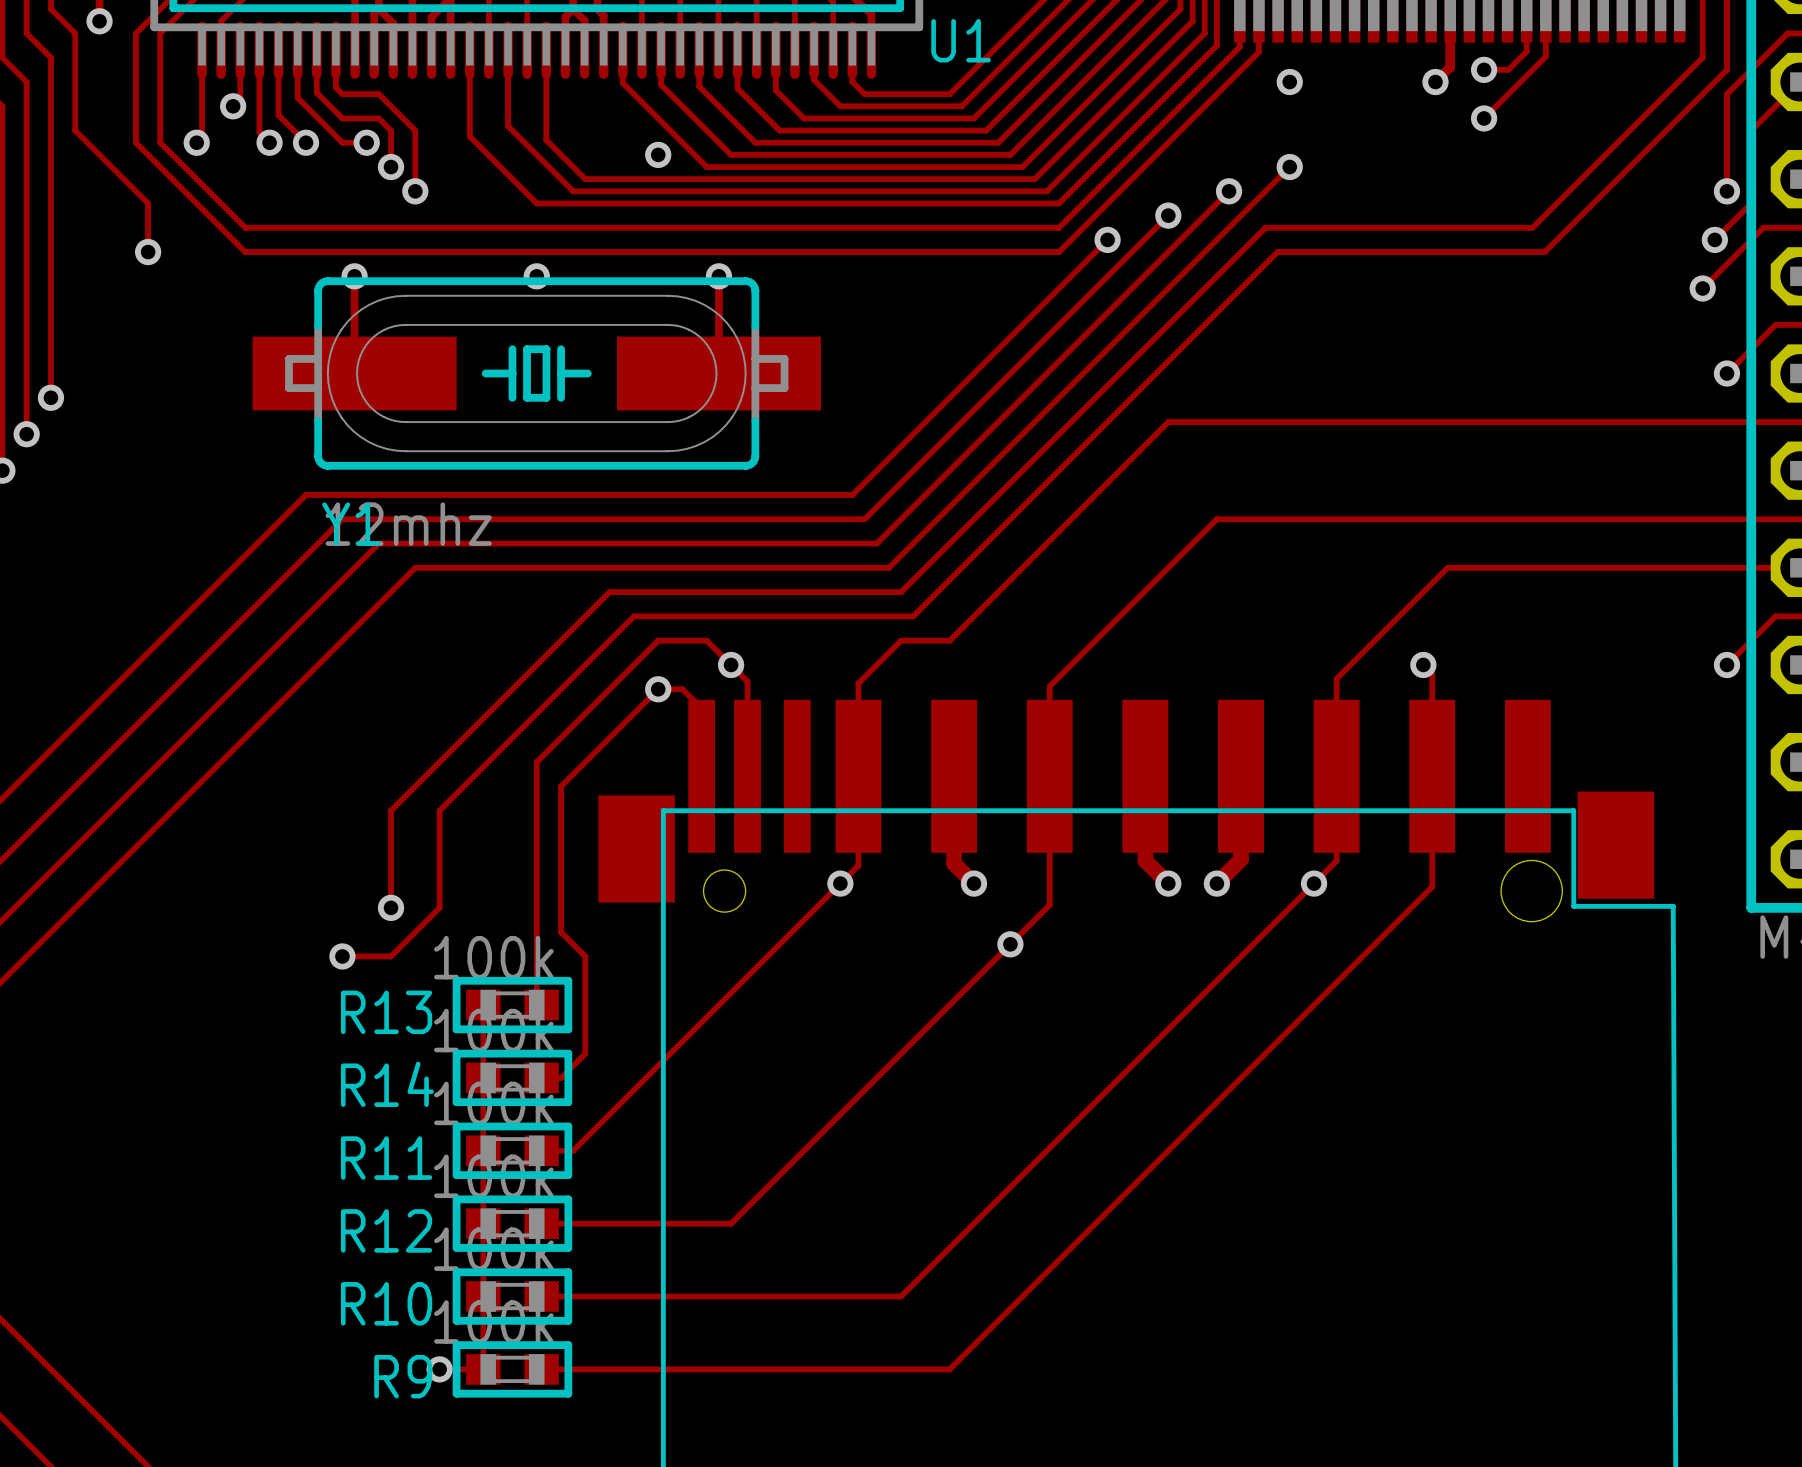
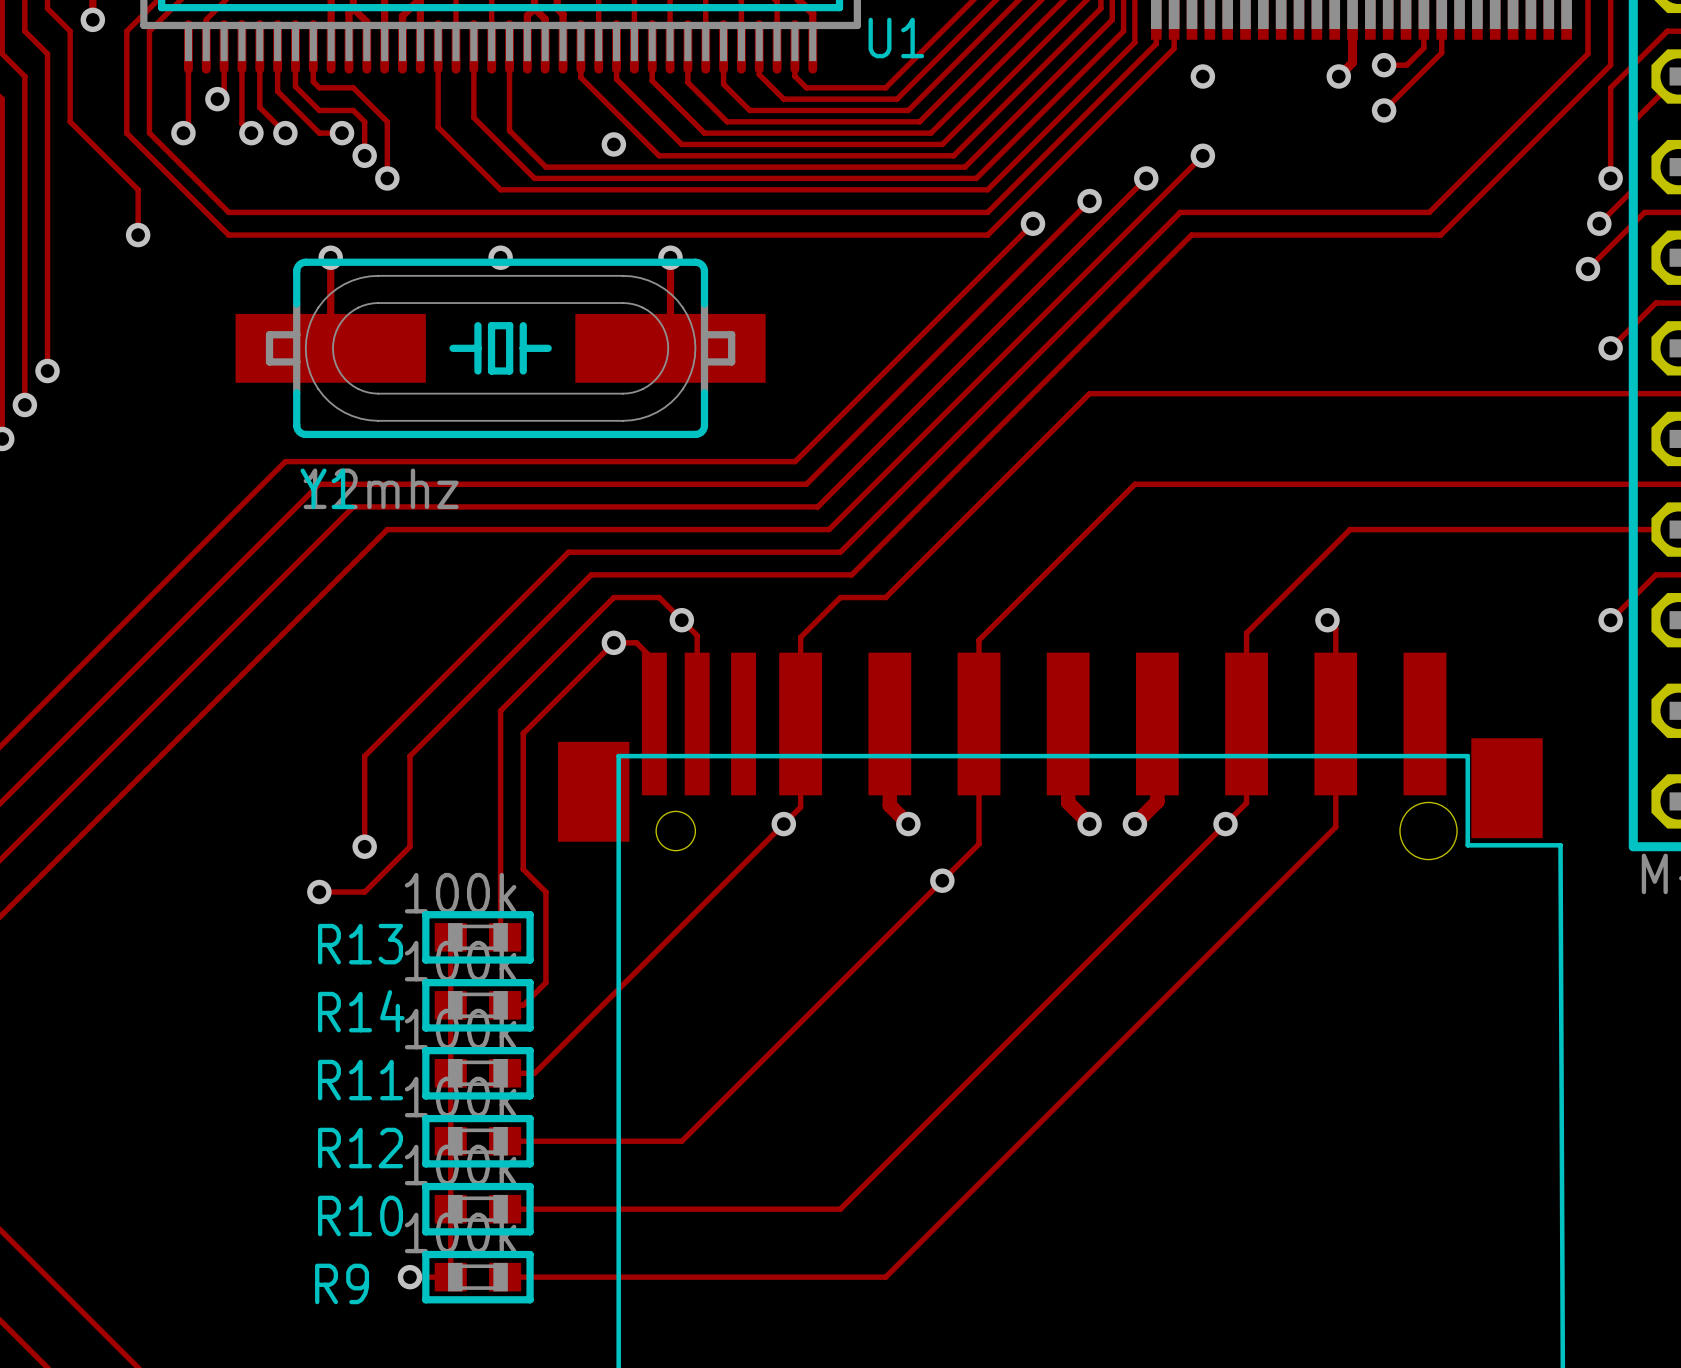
R9 name position: R9 (403, 1376) -> R9 (342, 1283)

